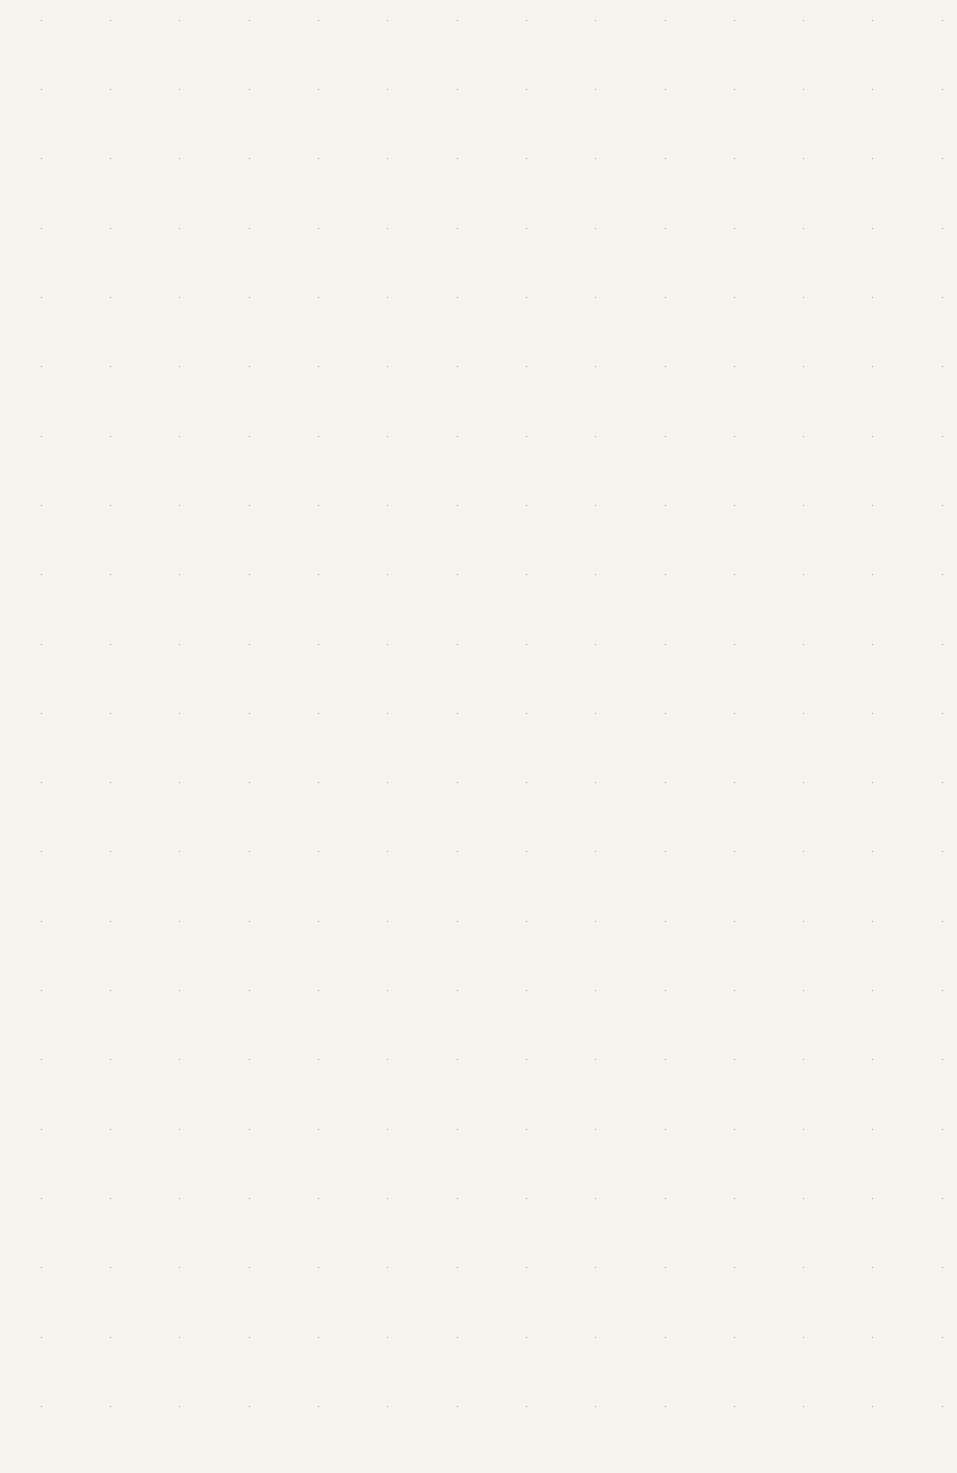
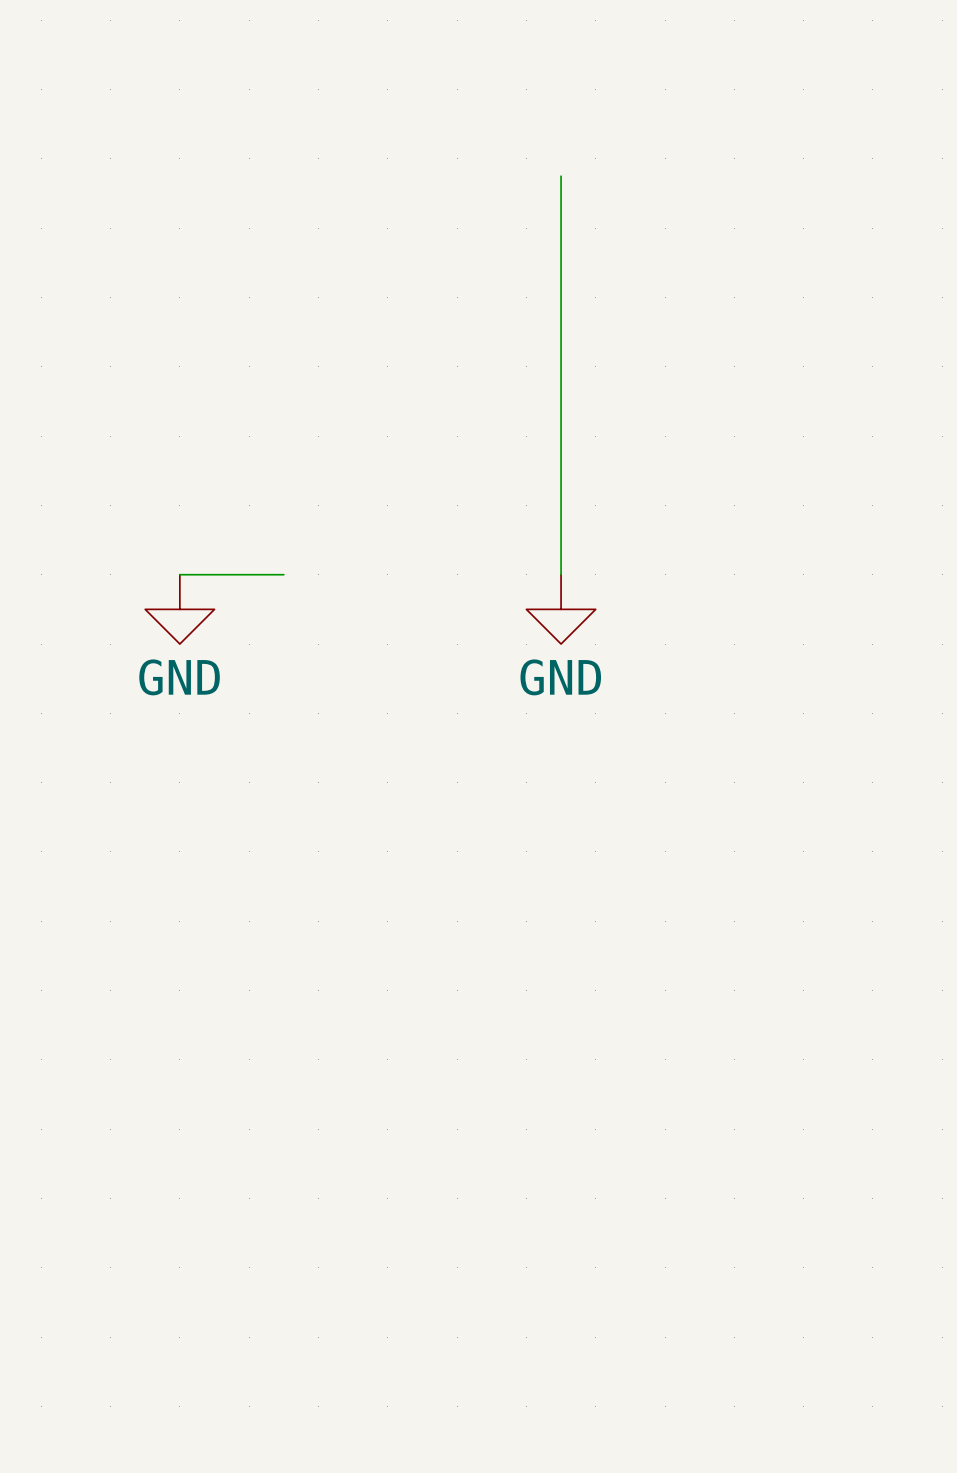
wire: none -> (561, 176) (561, 574)
wire: none -> (179, 574) (283, 574)
power symbol: none -> GND (179, 609)
power symbol: none -> GND (561, 609)

